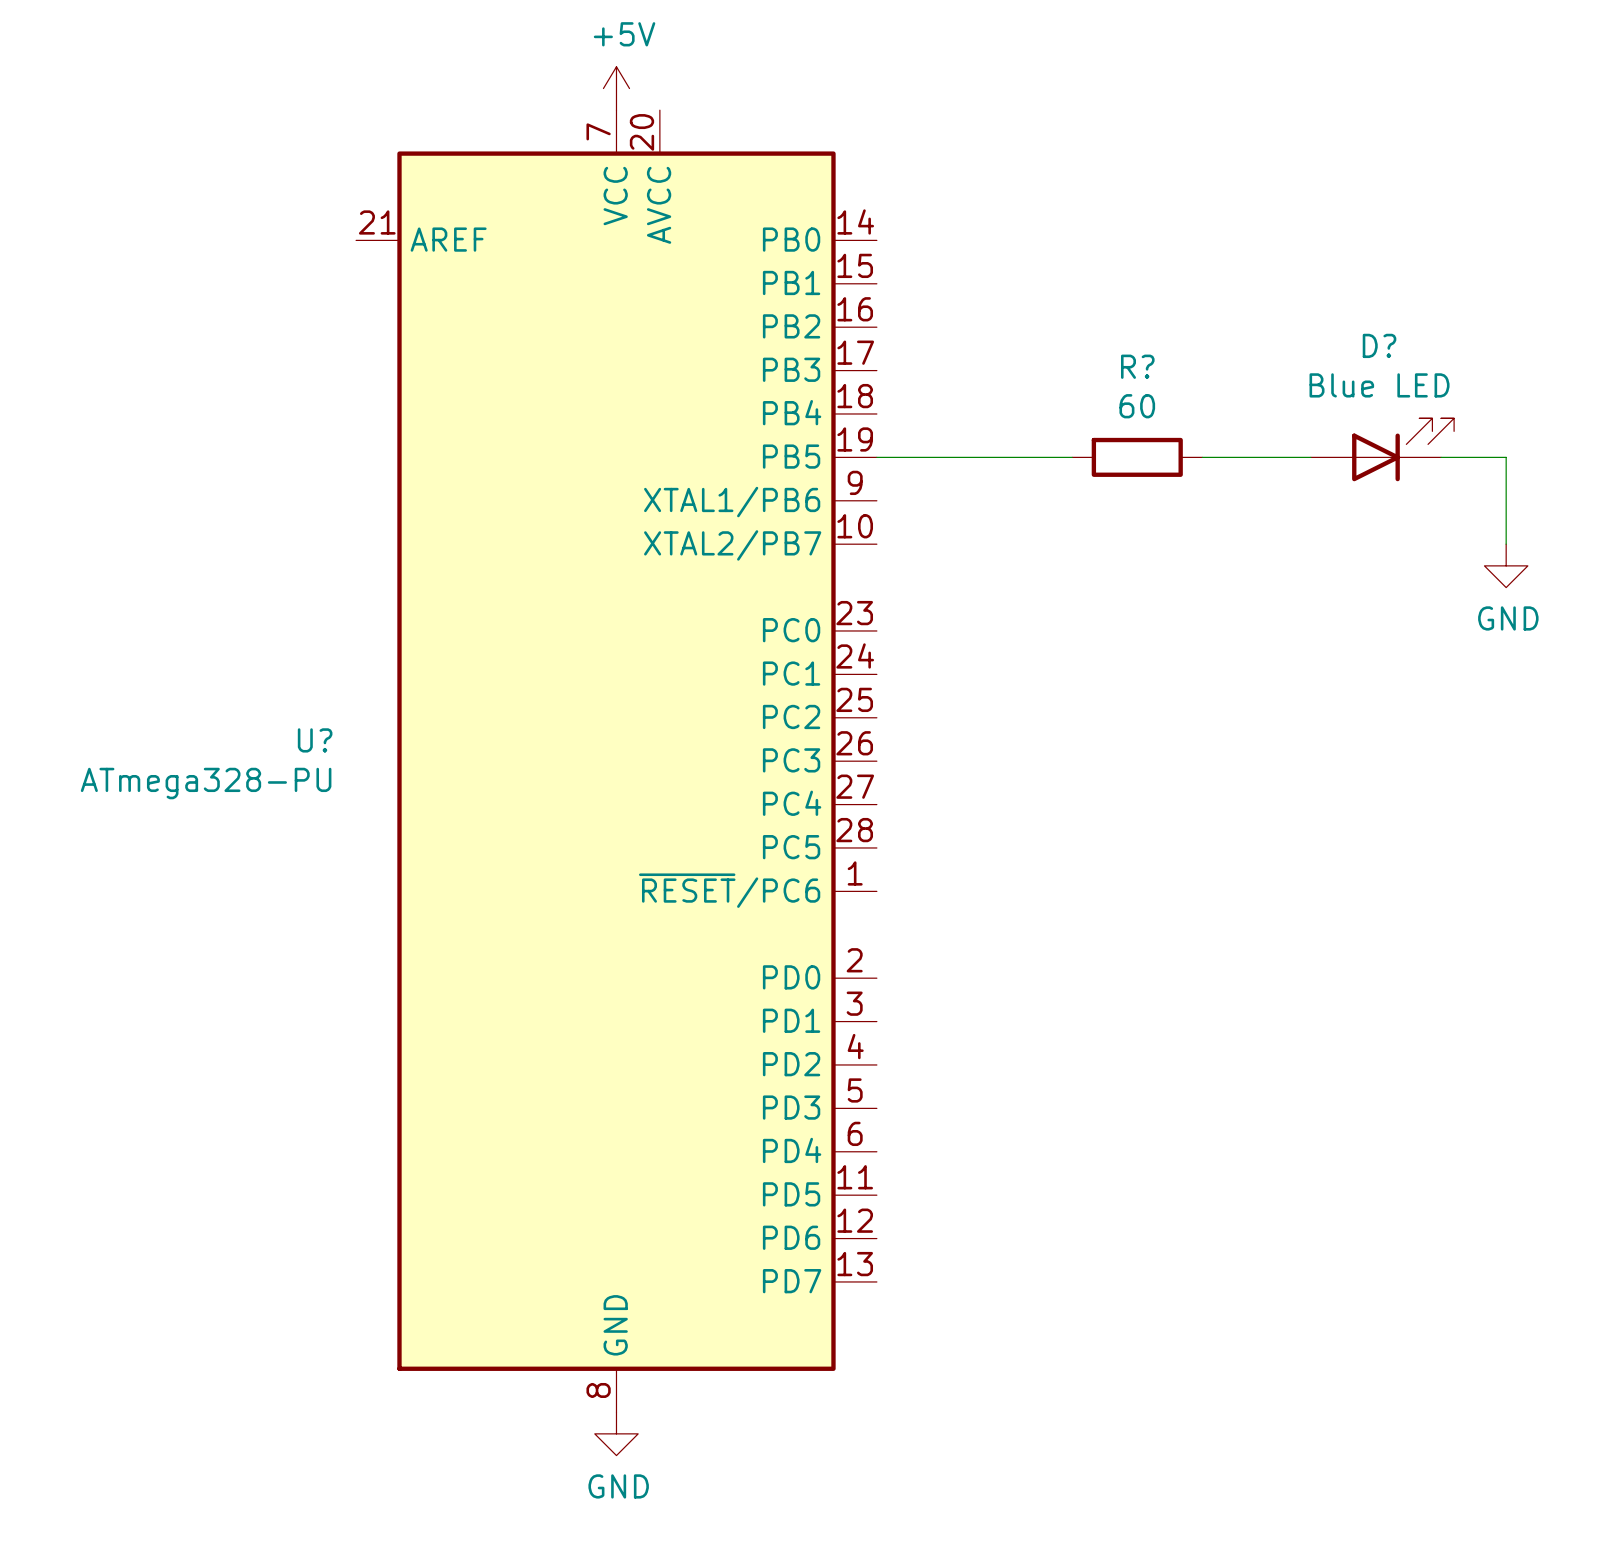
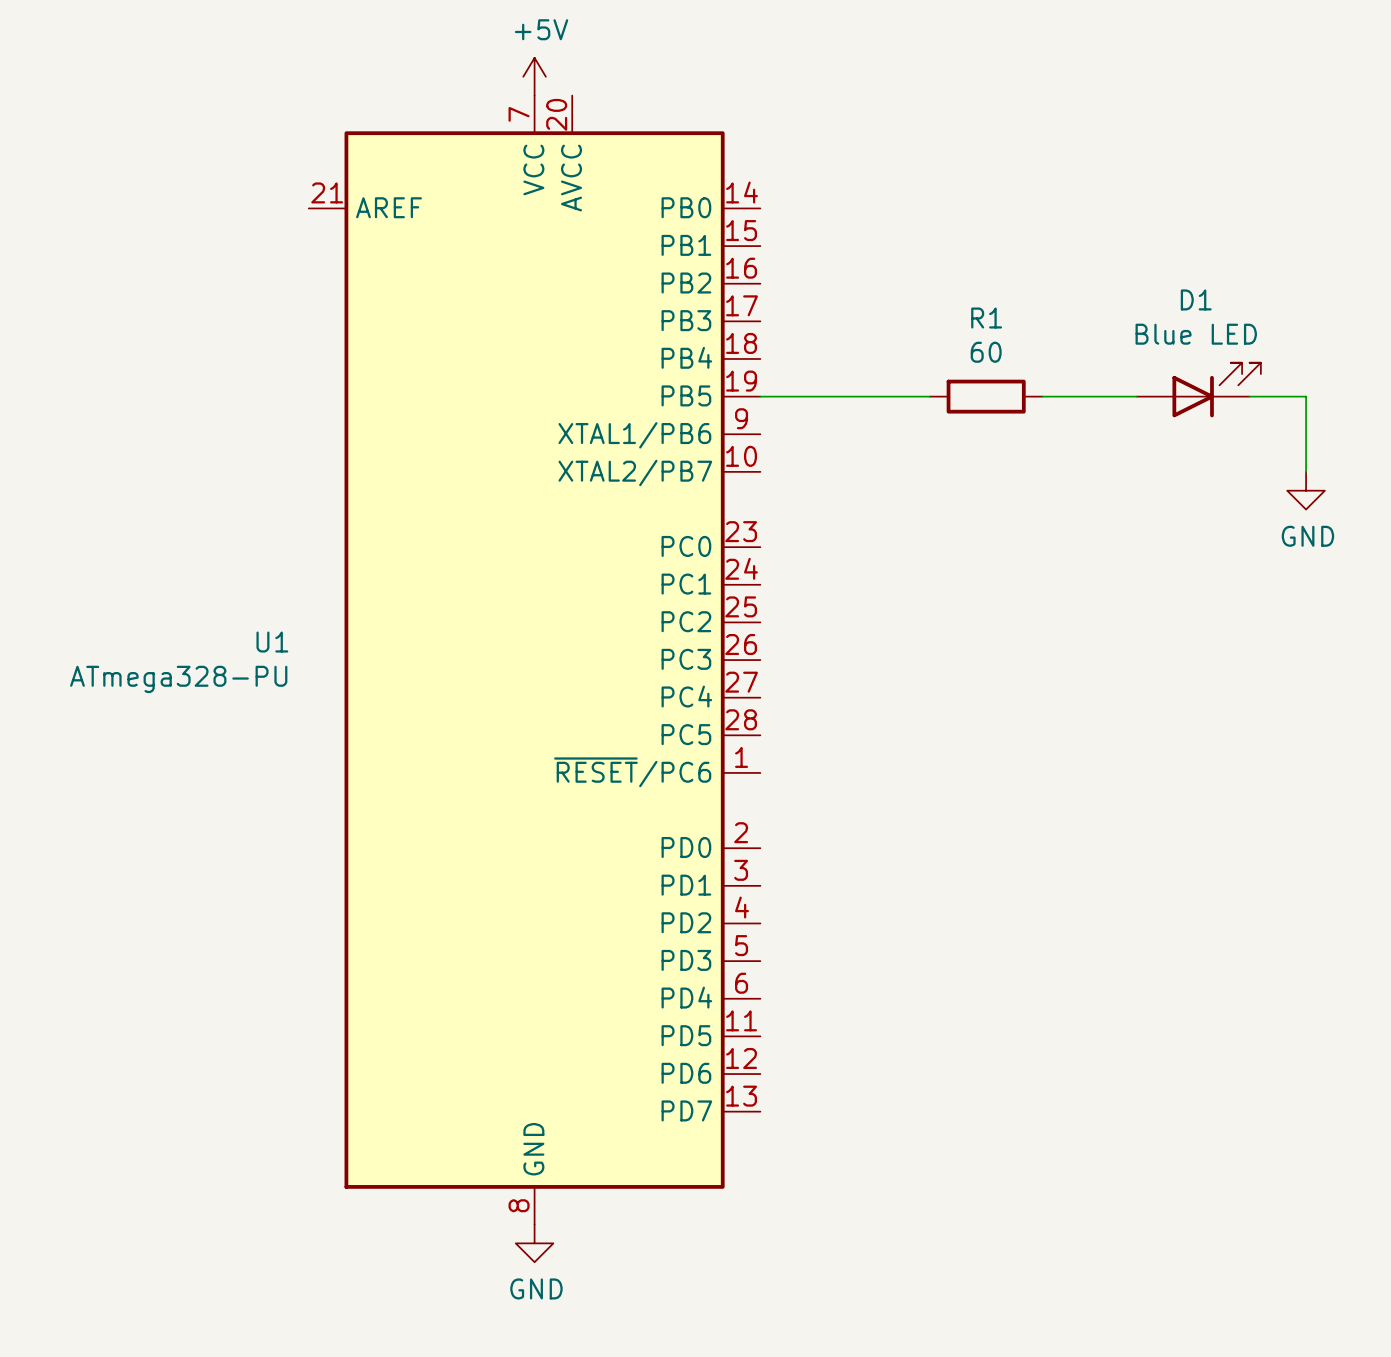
D? name: D? (1379, 345) -> D1 (1196, 299)
R? name: R? (1137, 366) -> R1 (986, 318)
U? name: U? (315, 740) -> U1 (272, 642)

